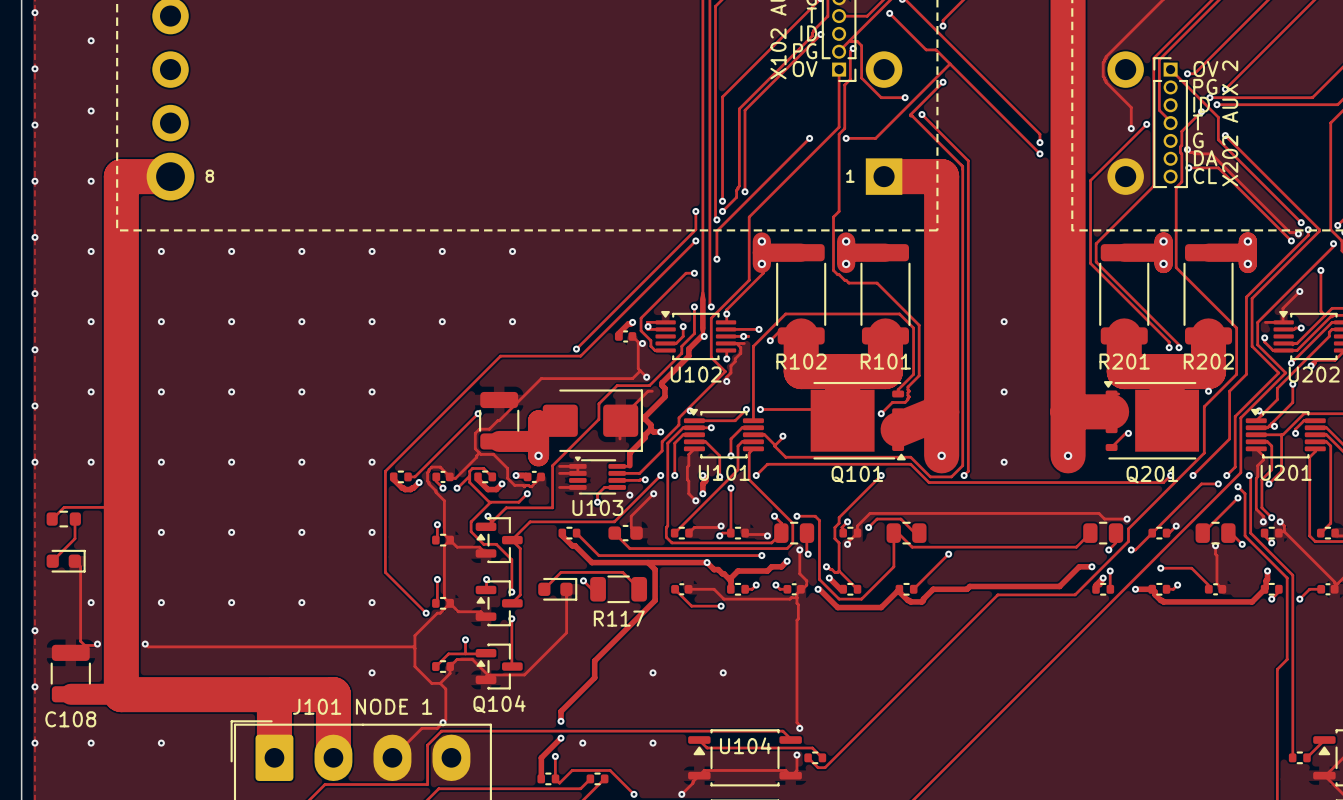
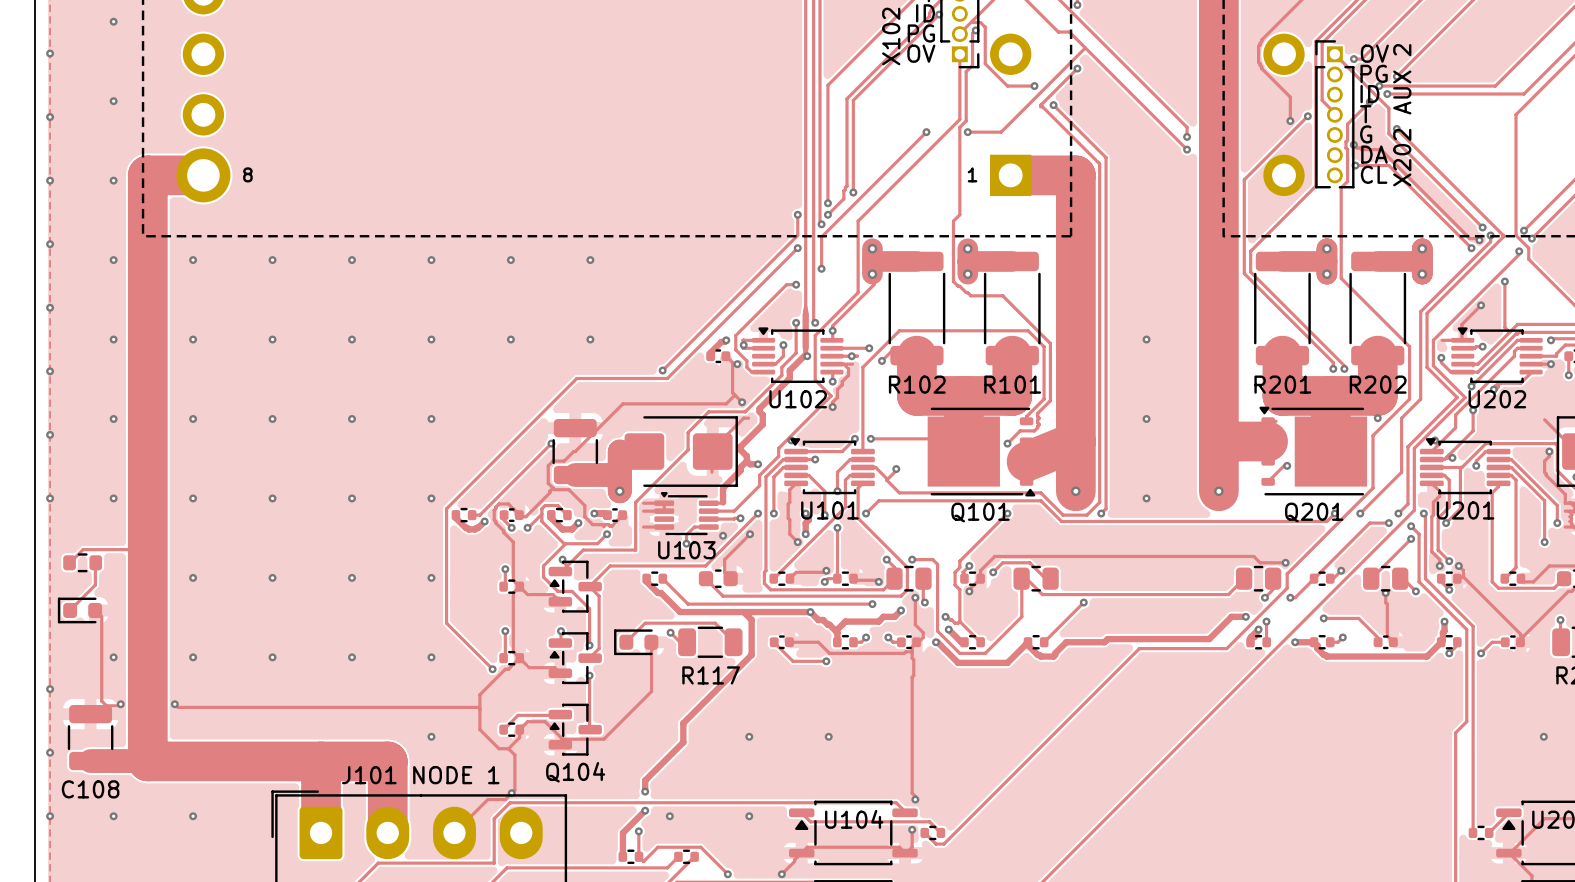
part rotation: 0° (66, 561) -> 180° (79, 610)
part rotation: 0° (557, 589) -> 180° (636, 642)
track: (465, 639) (465, 653) -> none
via: (465, 639) -> none

